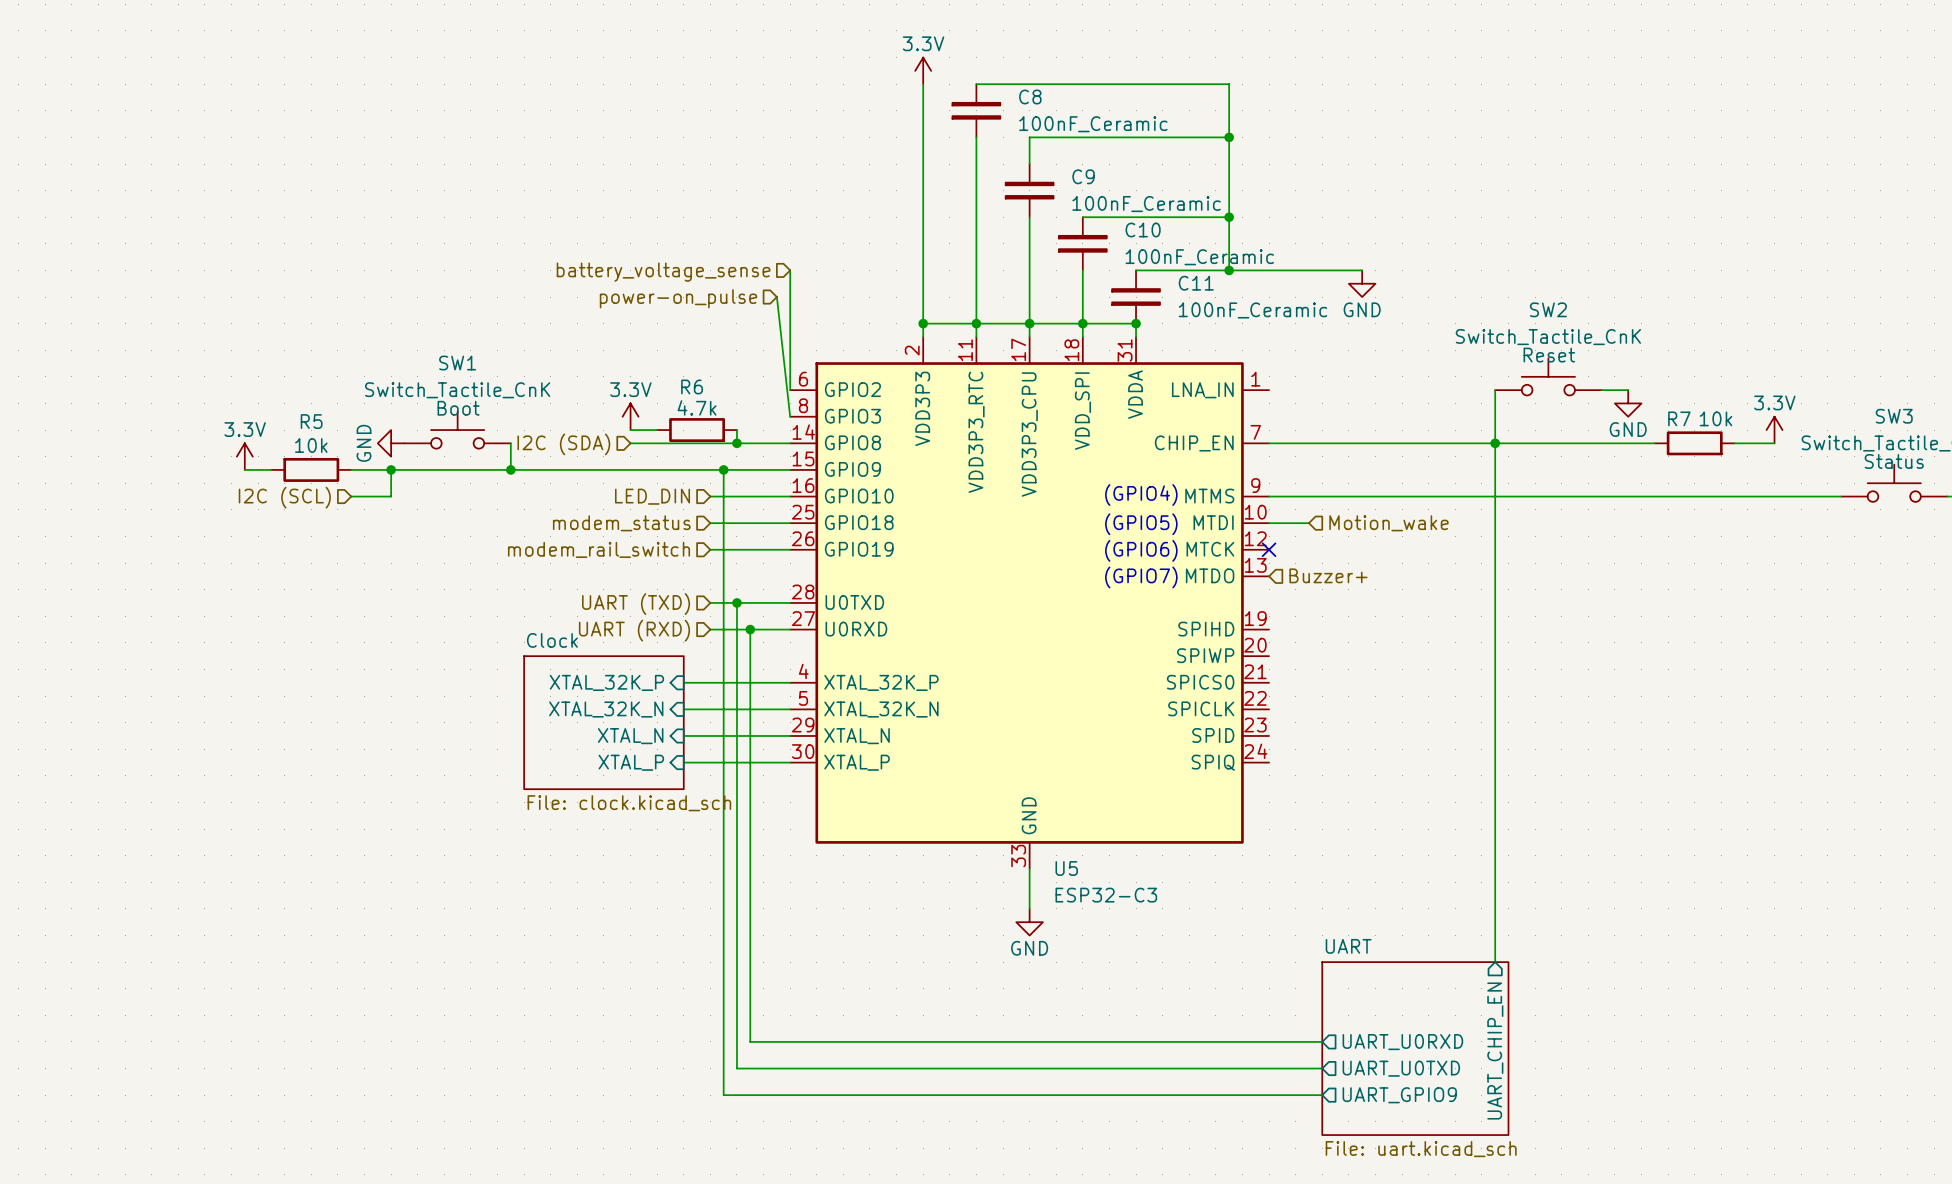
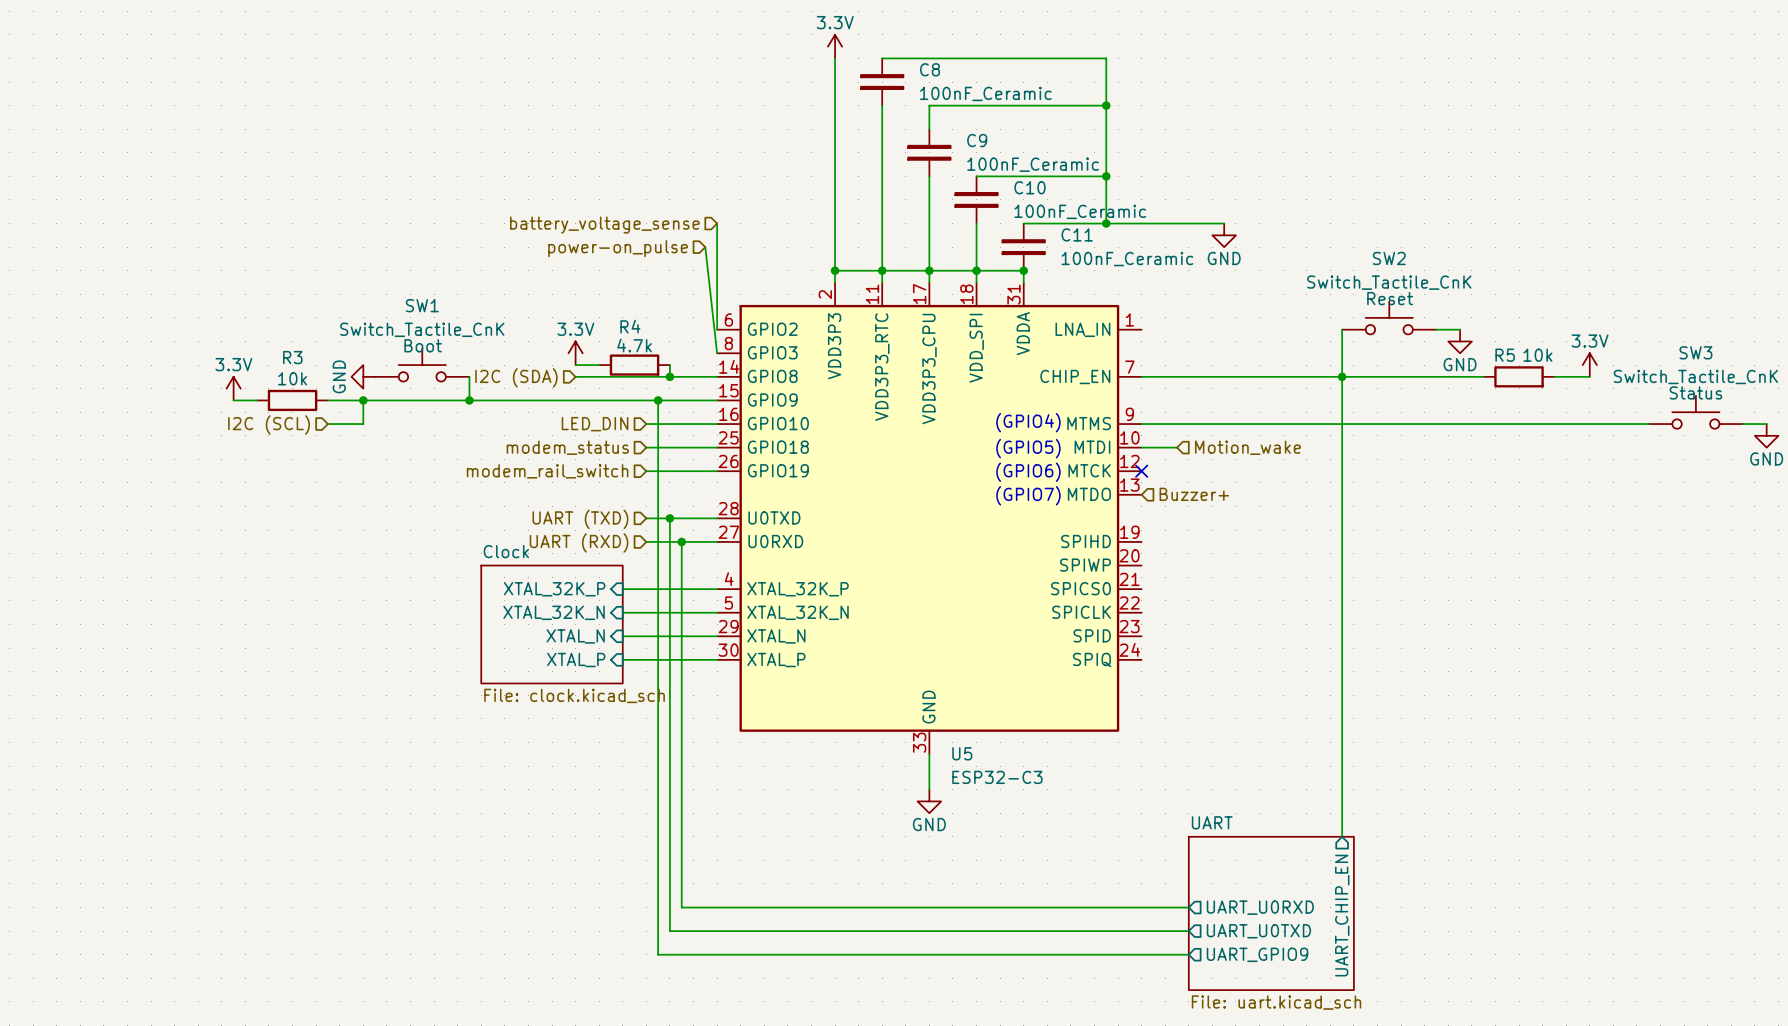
R6 name: R6 (692, 386) -> R4 (630, 326)
R7 name: R7 (1679, 418) -> R5 (1505, 355)
R5 name: R5 (311, 421) -> R3 (292, 357)

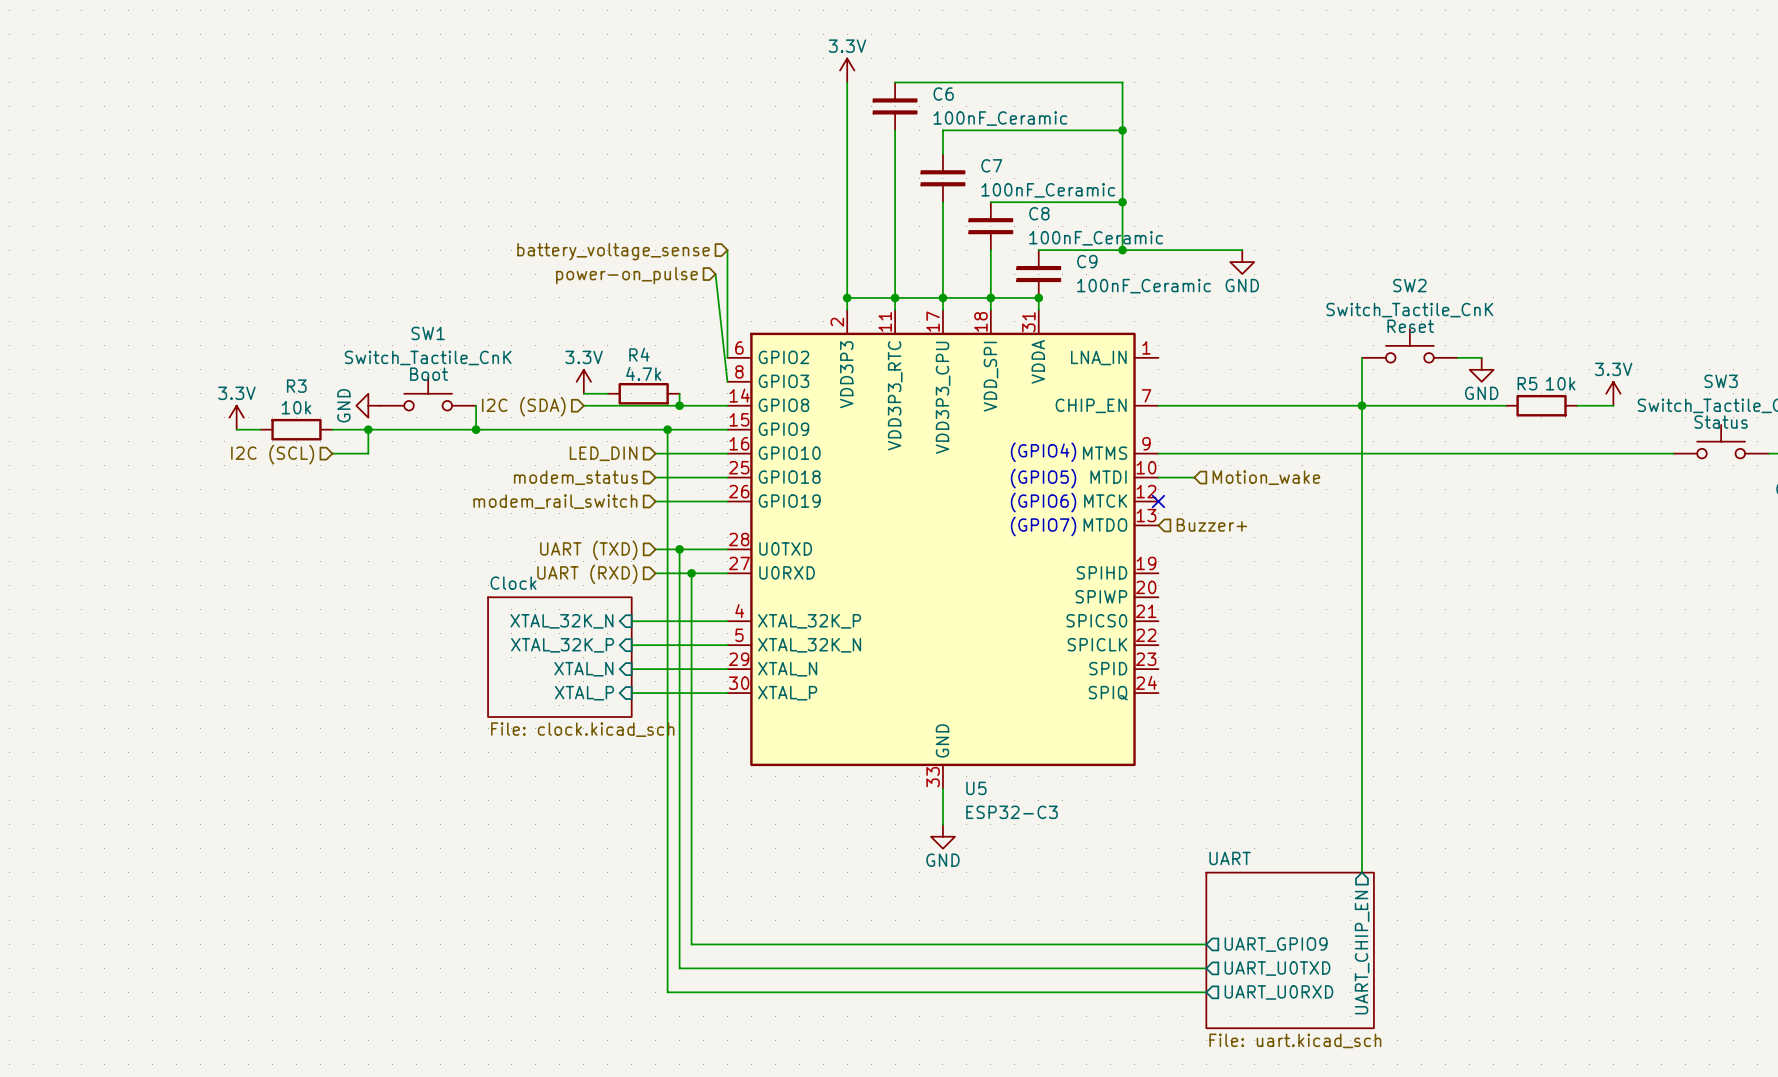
C8 name: C8 (930, 69) -> C6 (943, 94)
C9 name: C9 (977, 140) -> C7 (991, 165)
C10 name: C10 (1029, 187) -> C8 (1039, 213)
C11 name: C11 (1077, 234) -> C9 (1087, 261)
sheet pin: XTAL_32K_P (554, 589) -> XTAL_32K_N (561, 621)
sheet pin: XTAL_32K_N (554, 612) -> XTAL_32K_P (562, 645)
sheet pin: UART_U0RXD (1260, 907) -> UART_GPIO9 (1276, 944)
sheet pin: UART_GPIO9 (1257, 954) -> UART_U0RXD (1278, 992)

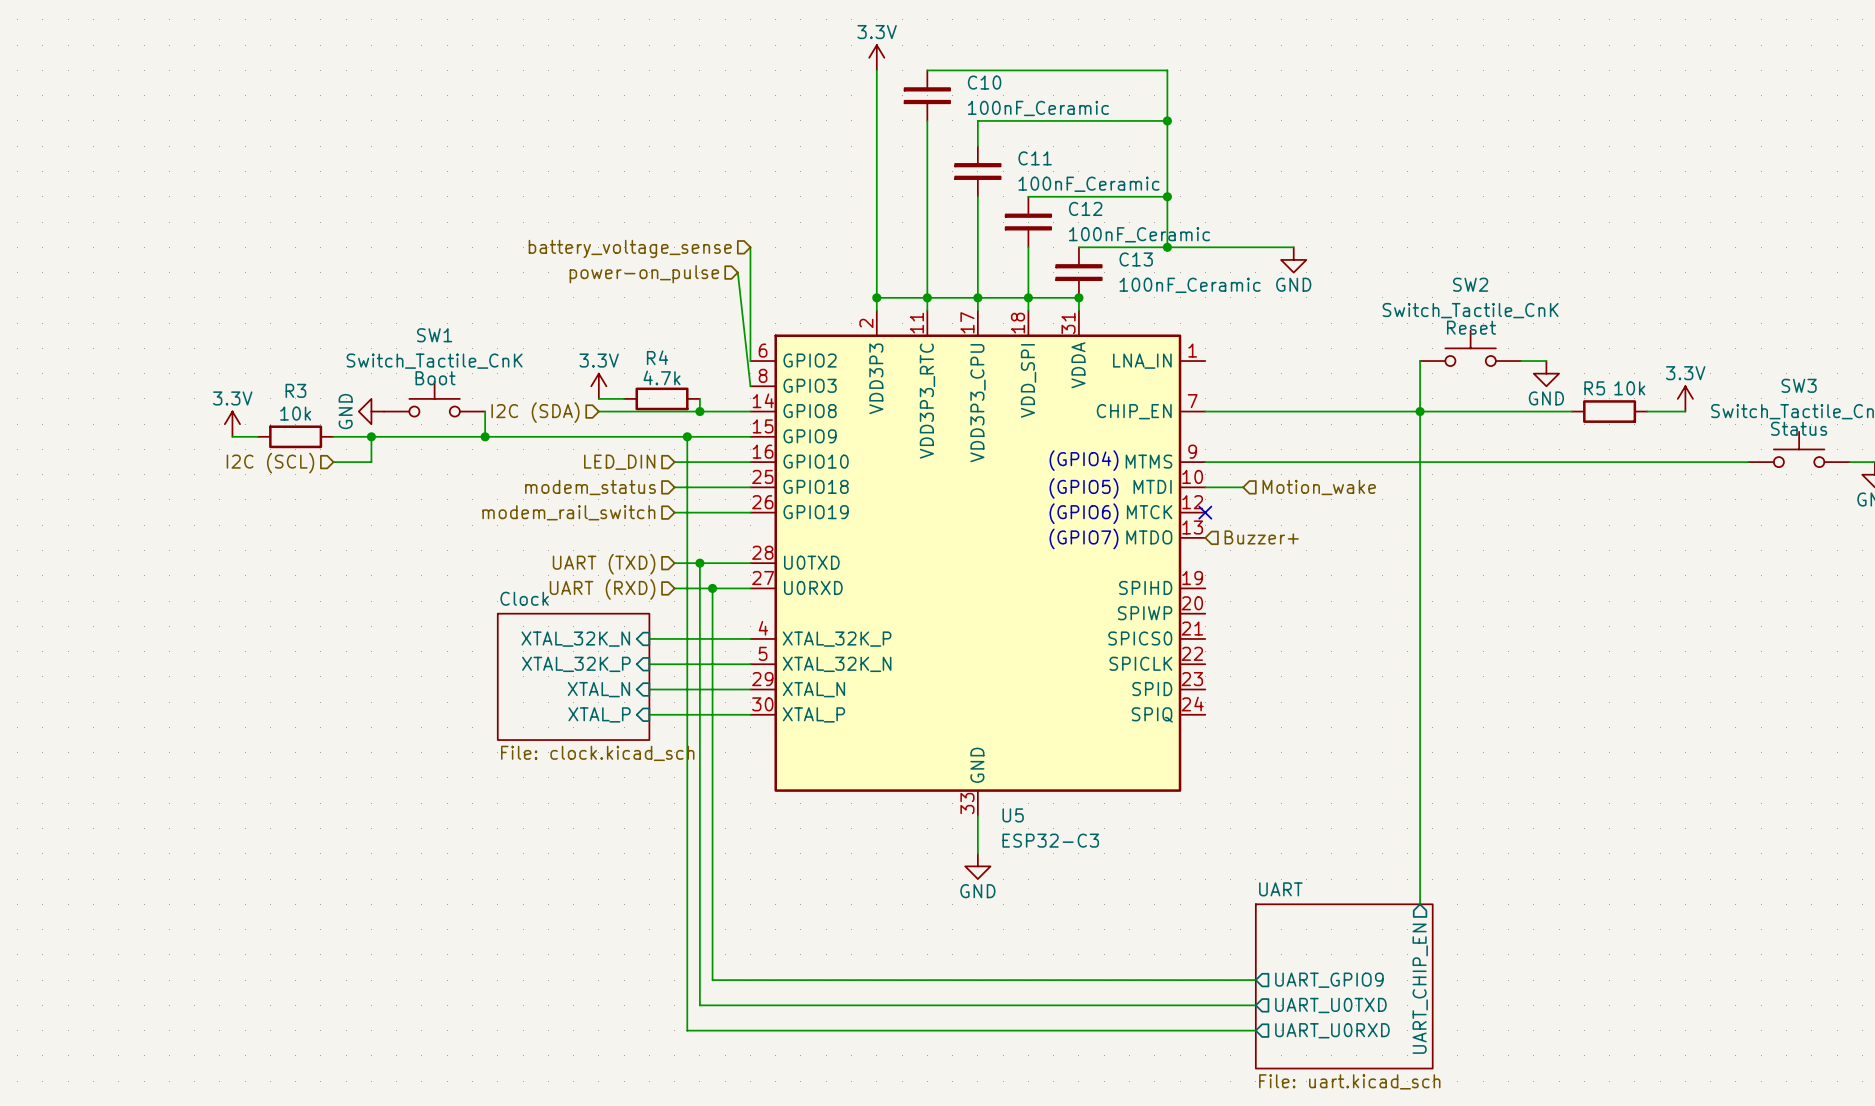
C6 name: C6 (943, 94) -> C10 (984, 82)
C7 name: C7 (991, 165) -> C11 (1035, 158)
C8 name: C8 (1039, 213) -> C12 (1085, 208)
C9 name: C9 (1087, 261) -> C13 (1136, 259)

